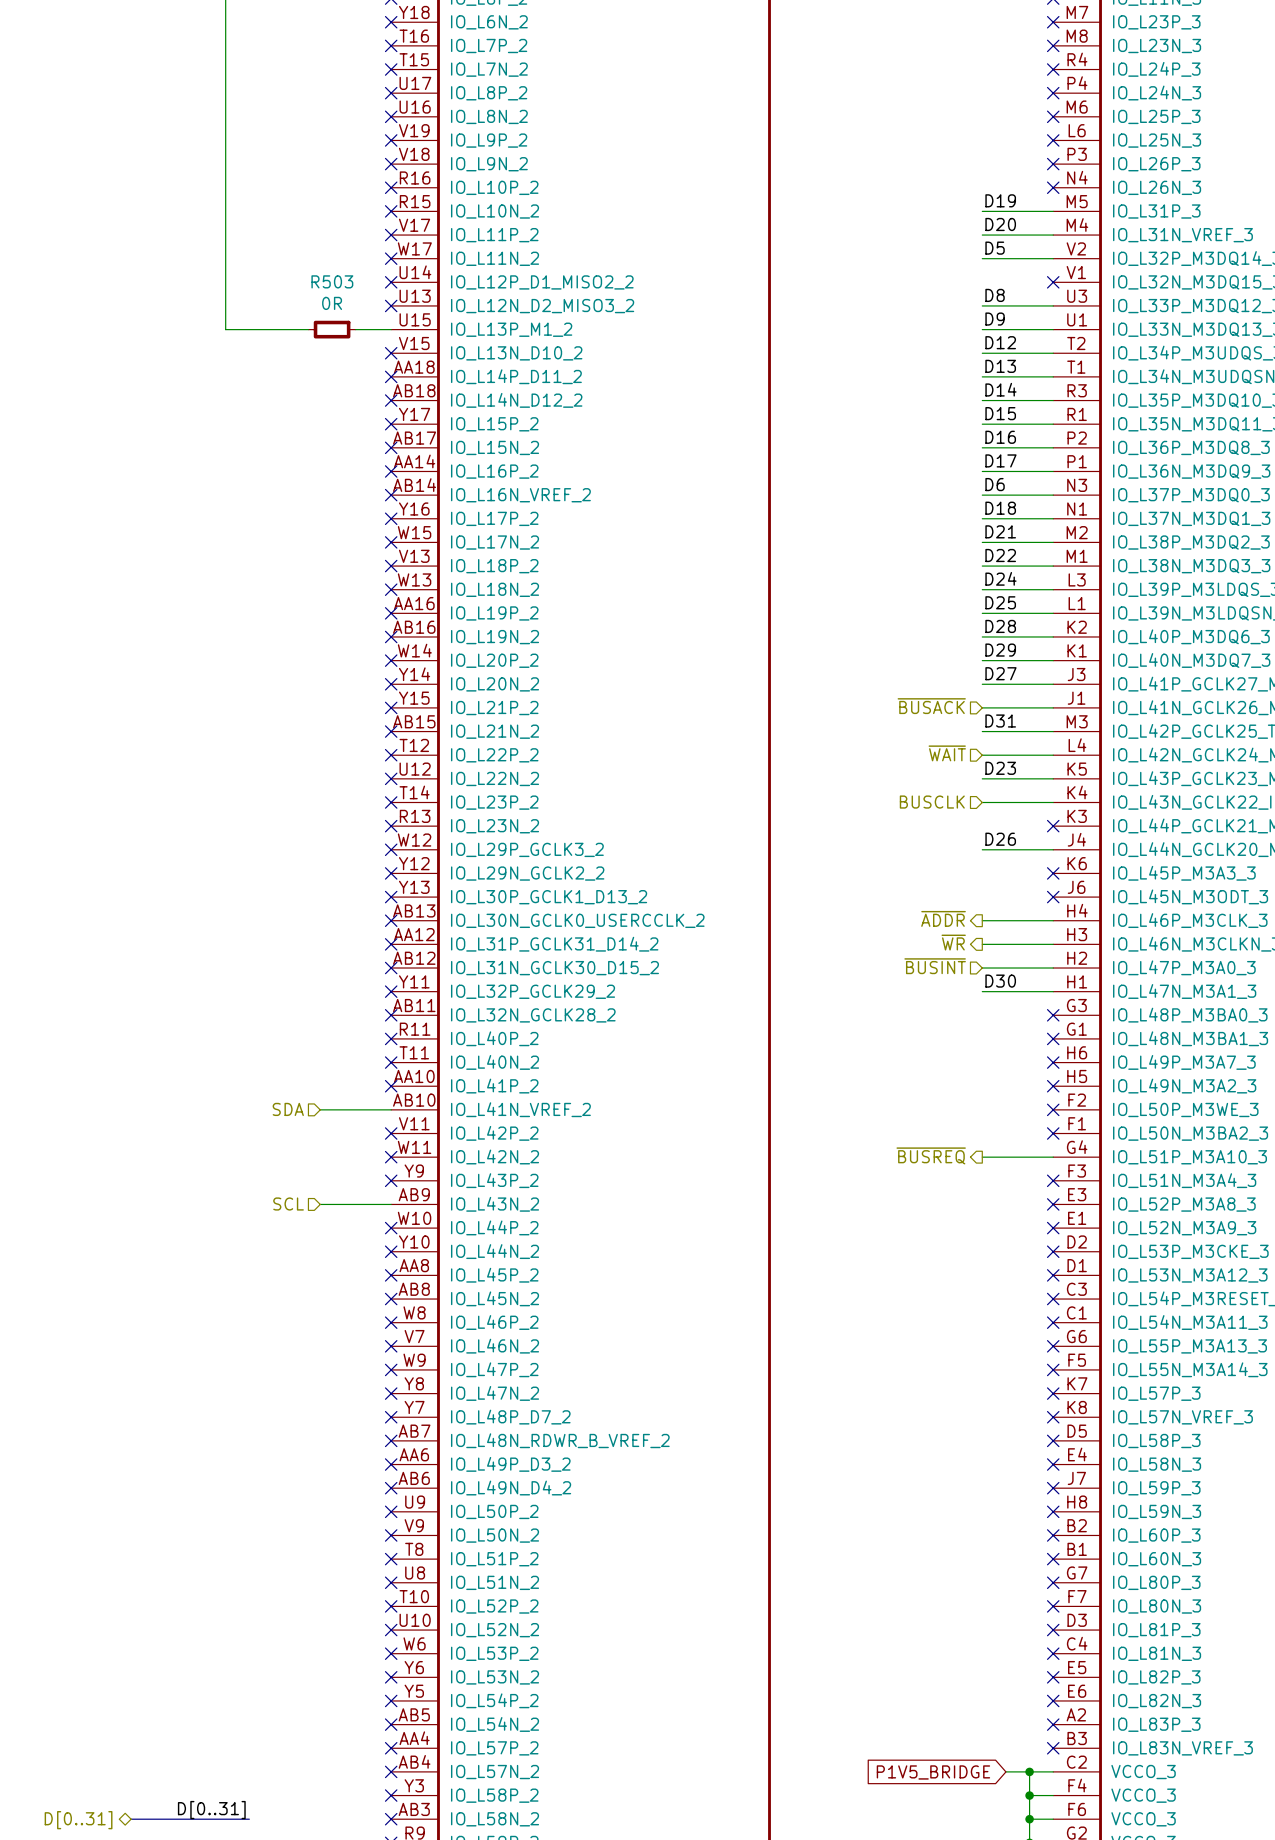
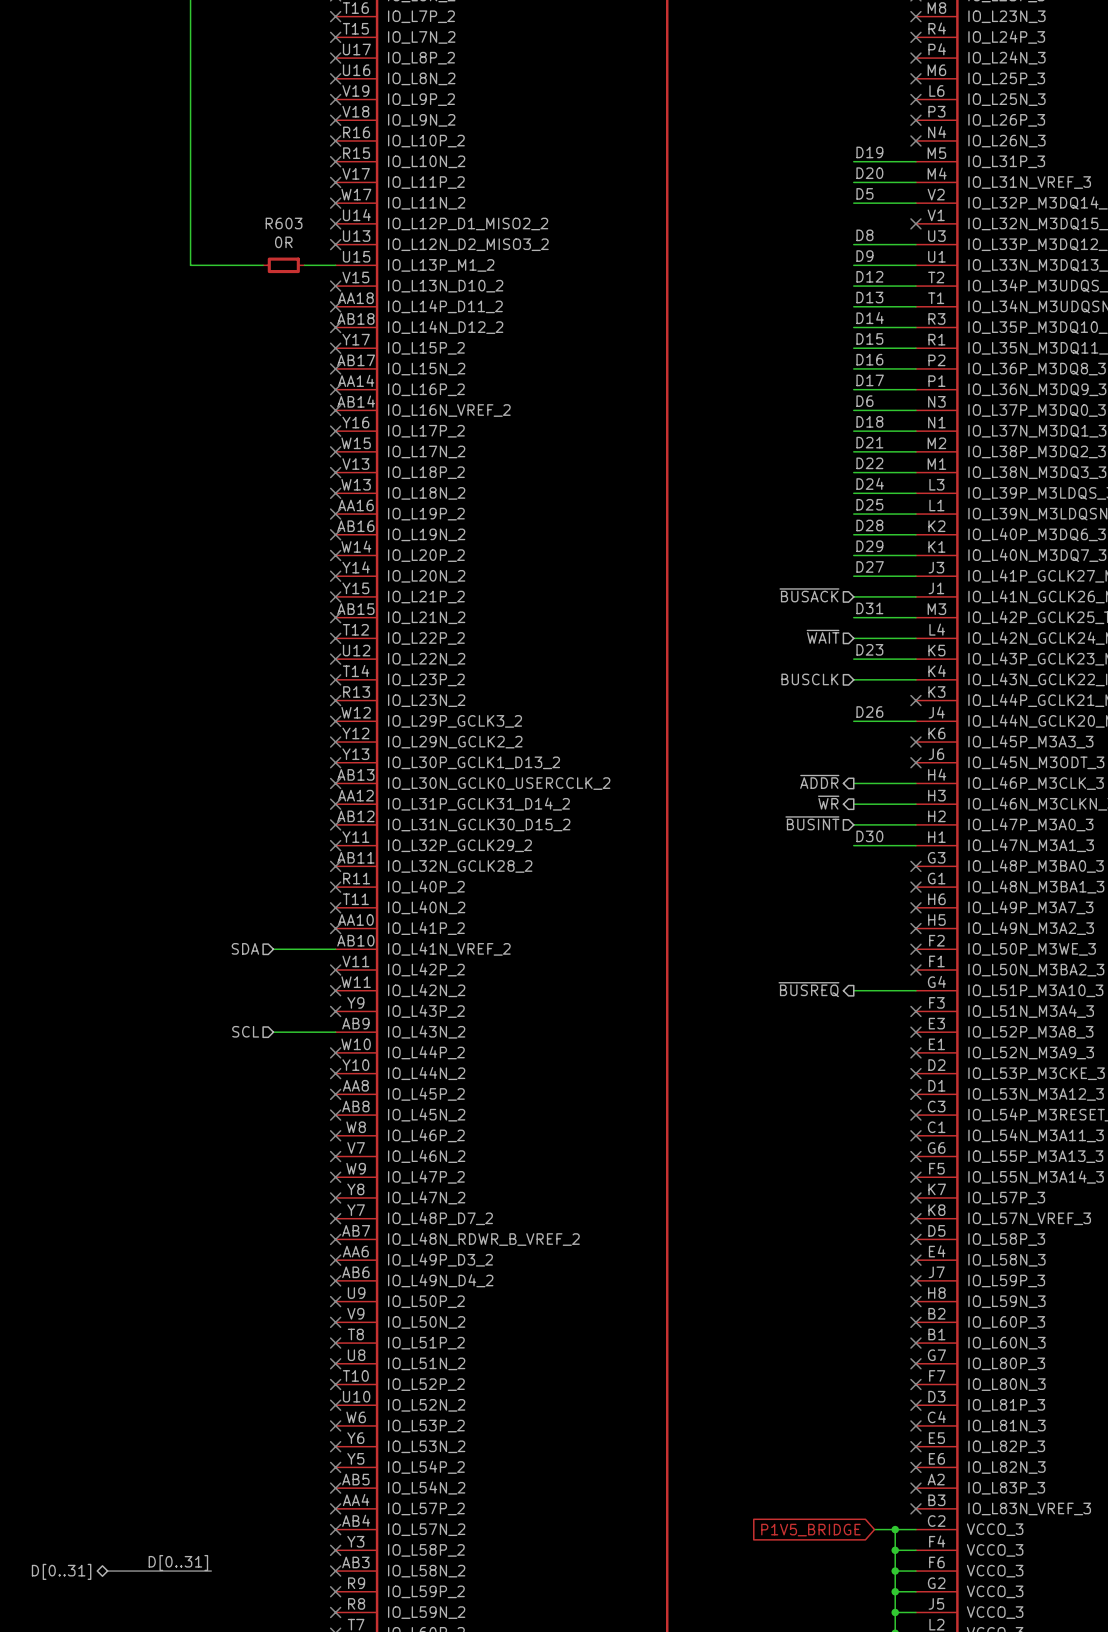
R503 name: R503 (332, 281) -> R603 (284, 223)

